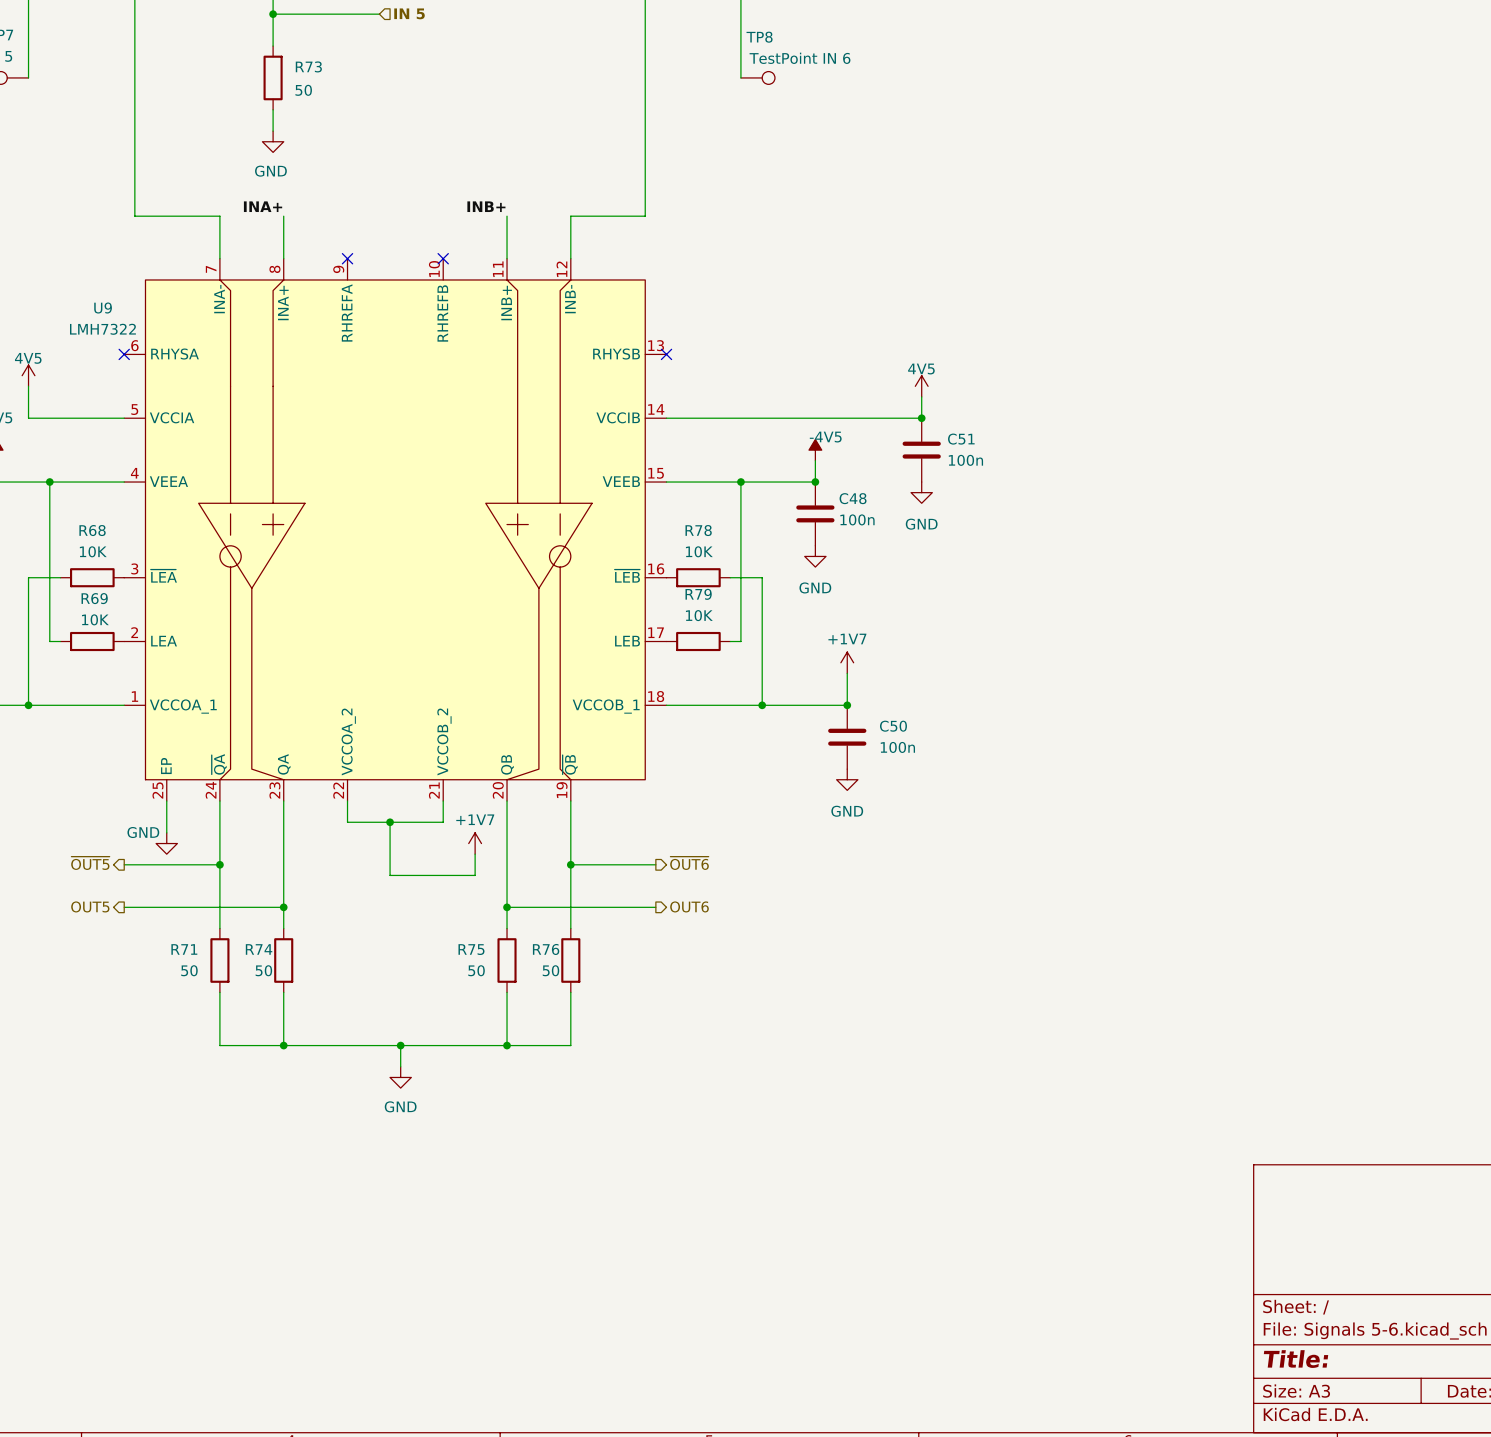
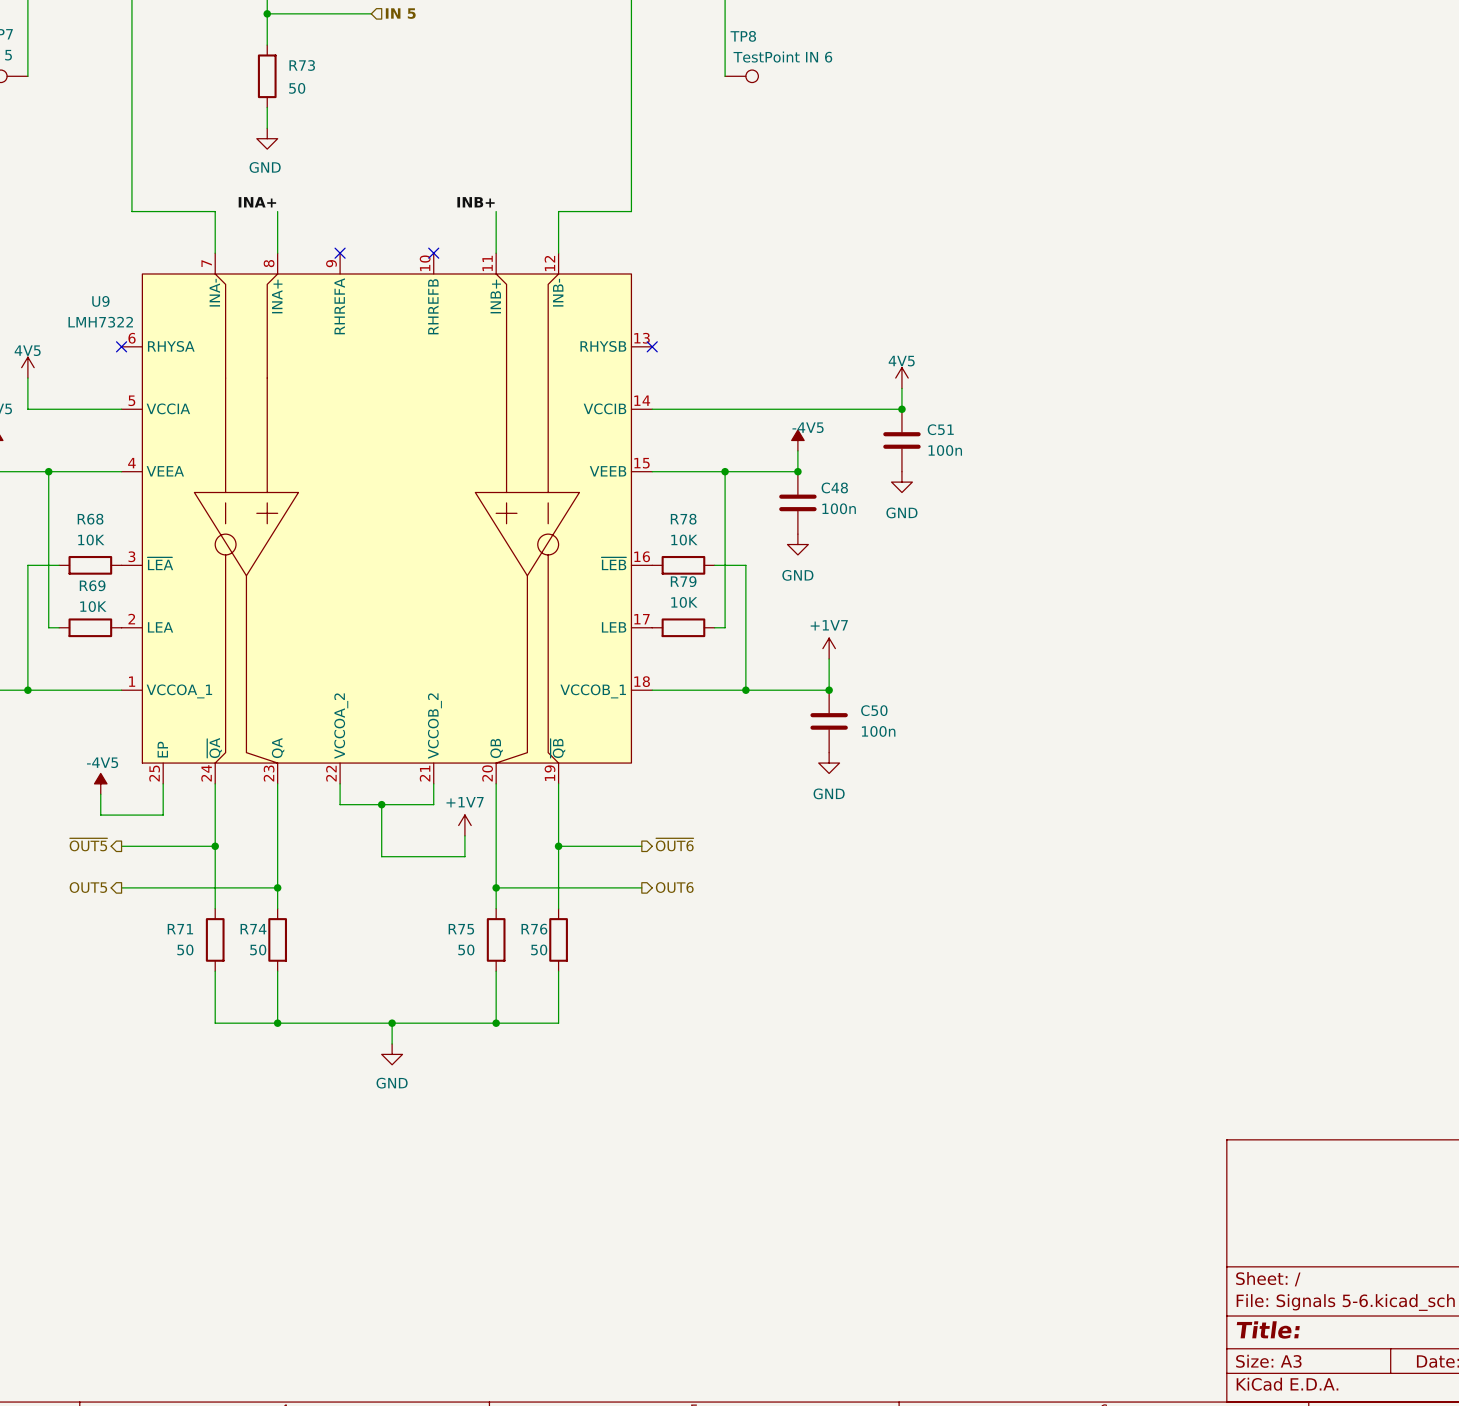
power symbol: none -> -4V5 (100, 783)
wire: none -> (100, 794) (100, 815) (163, 815)
power symbol: GND (166, 843) -> none

